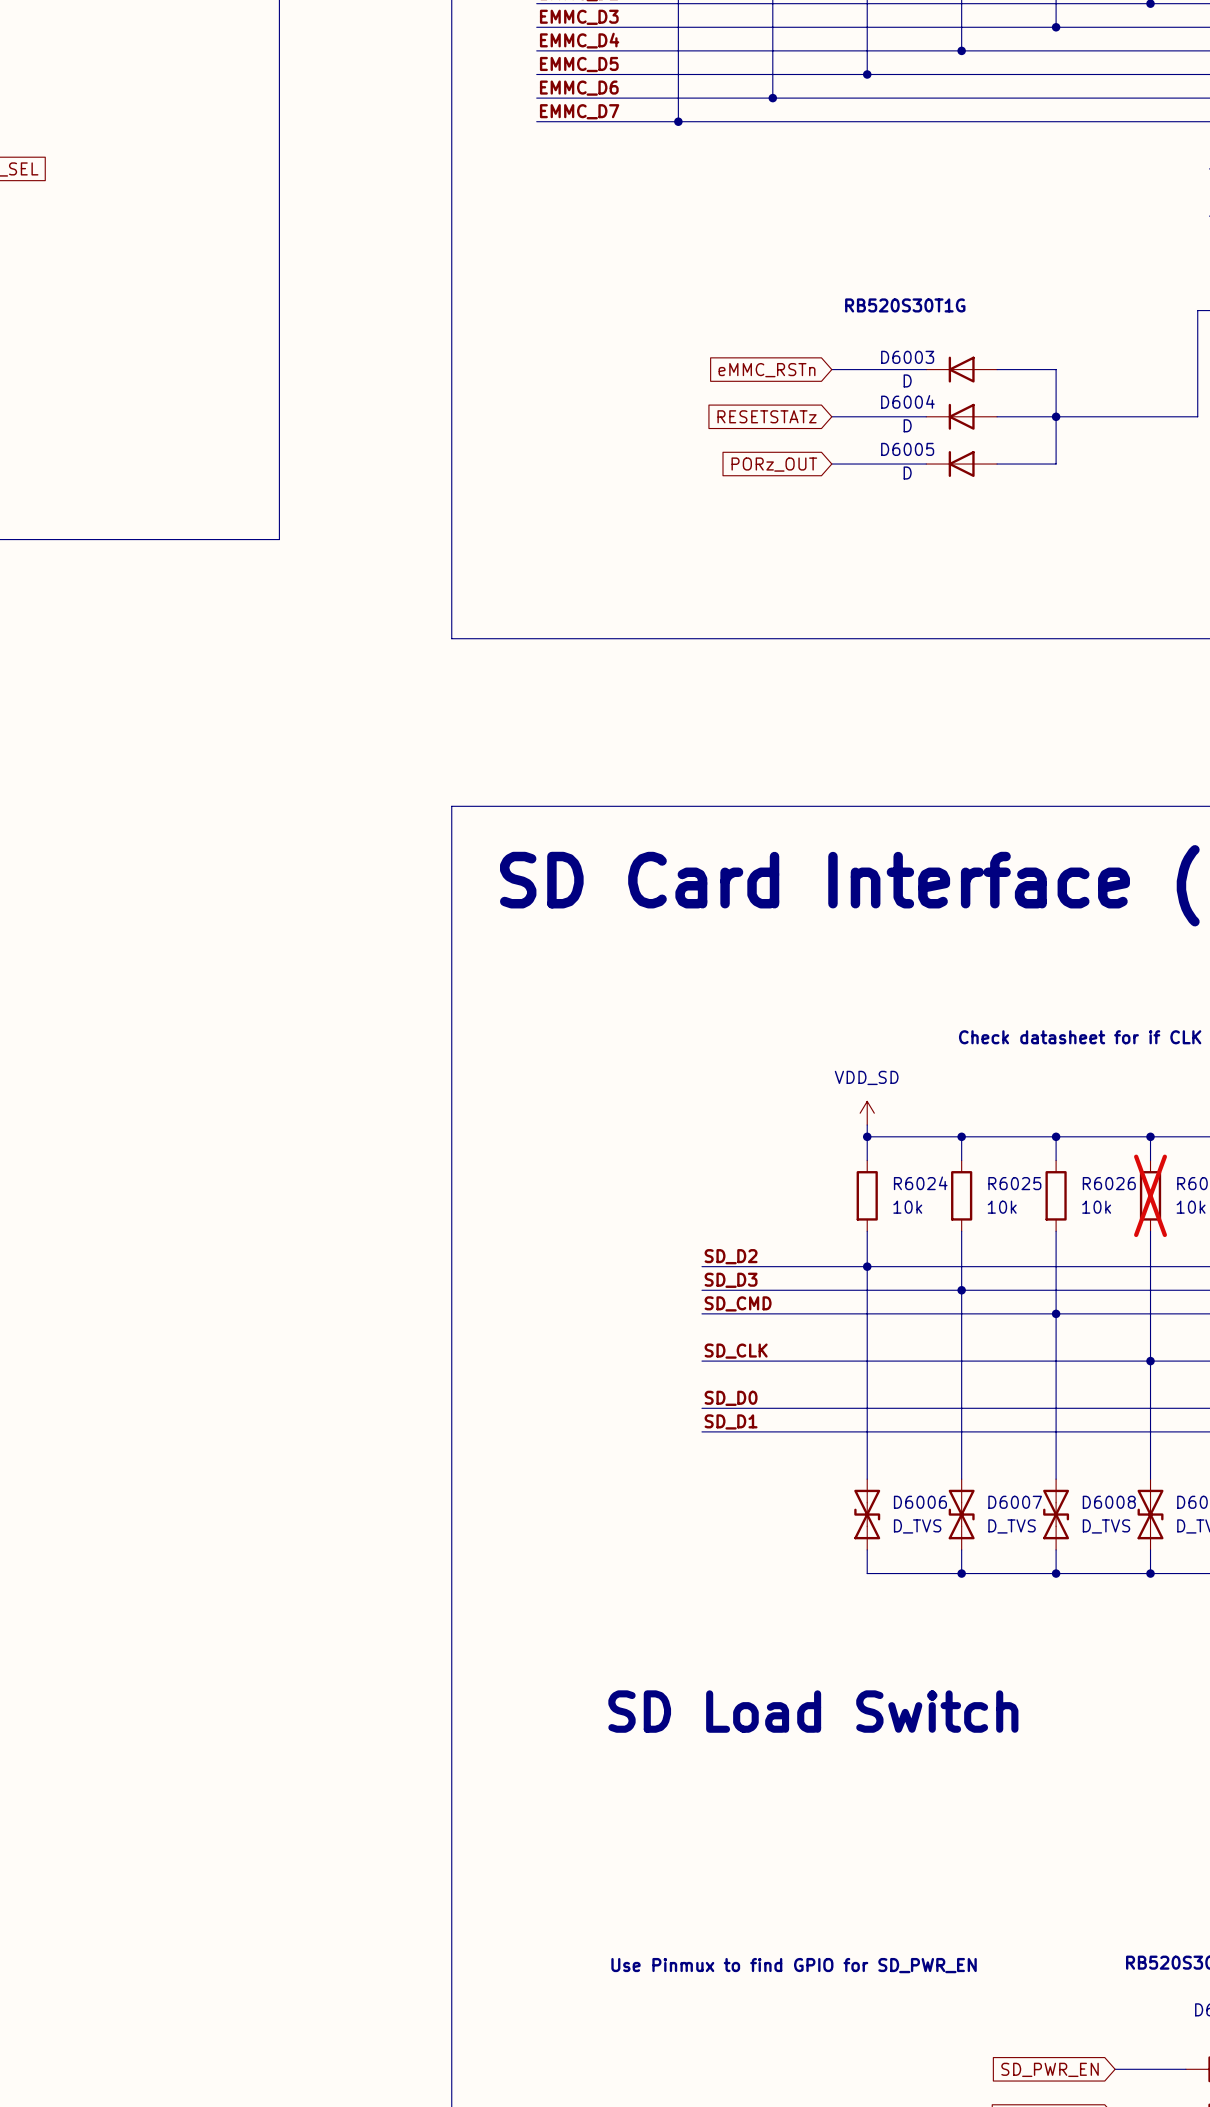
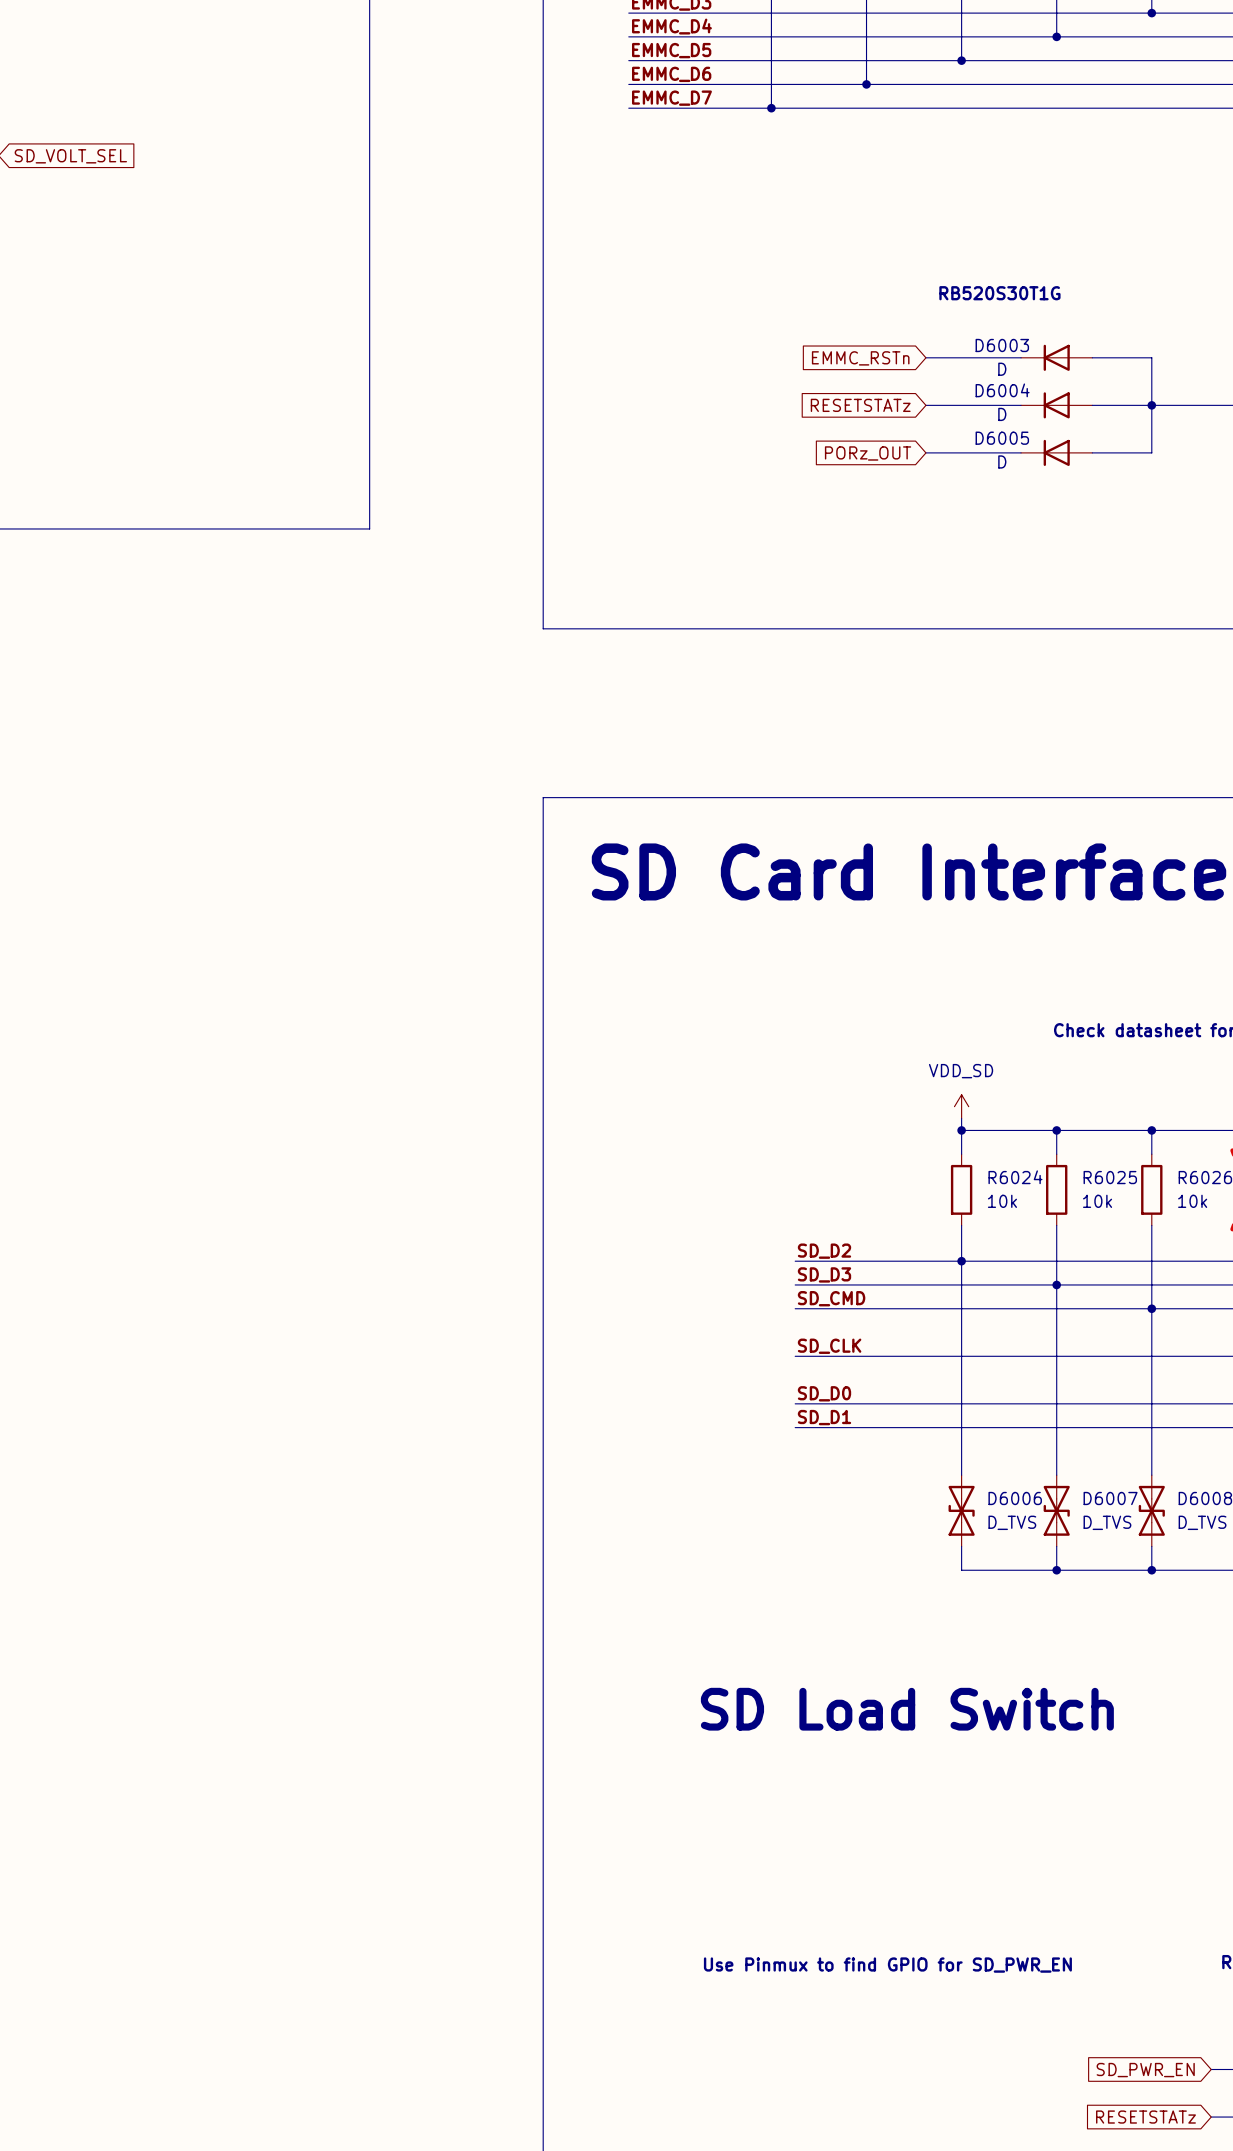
global label: eMMC_RSTn (767, 370) -> EMMC_RSTn (860, 358)

